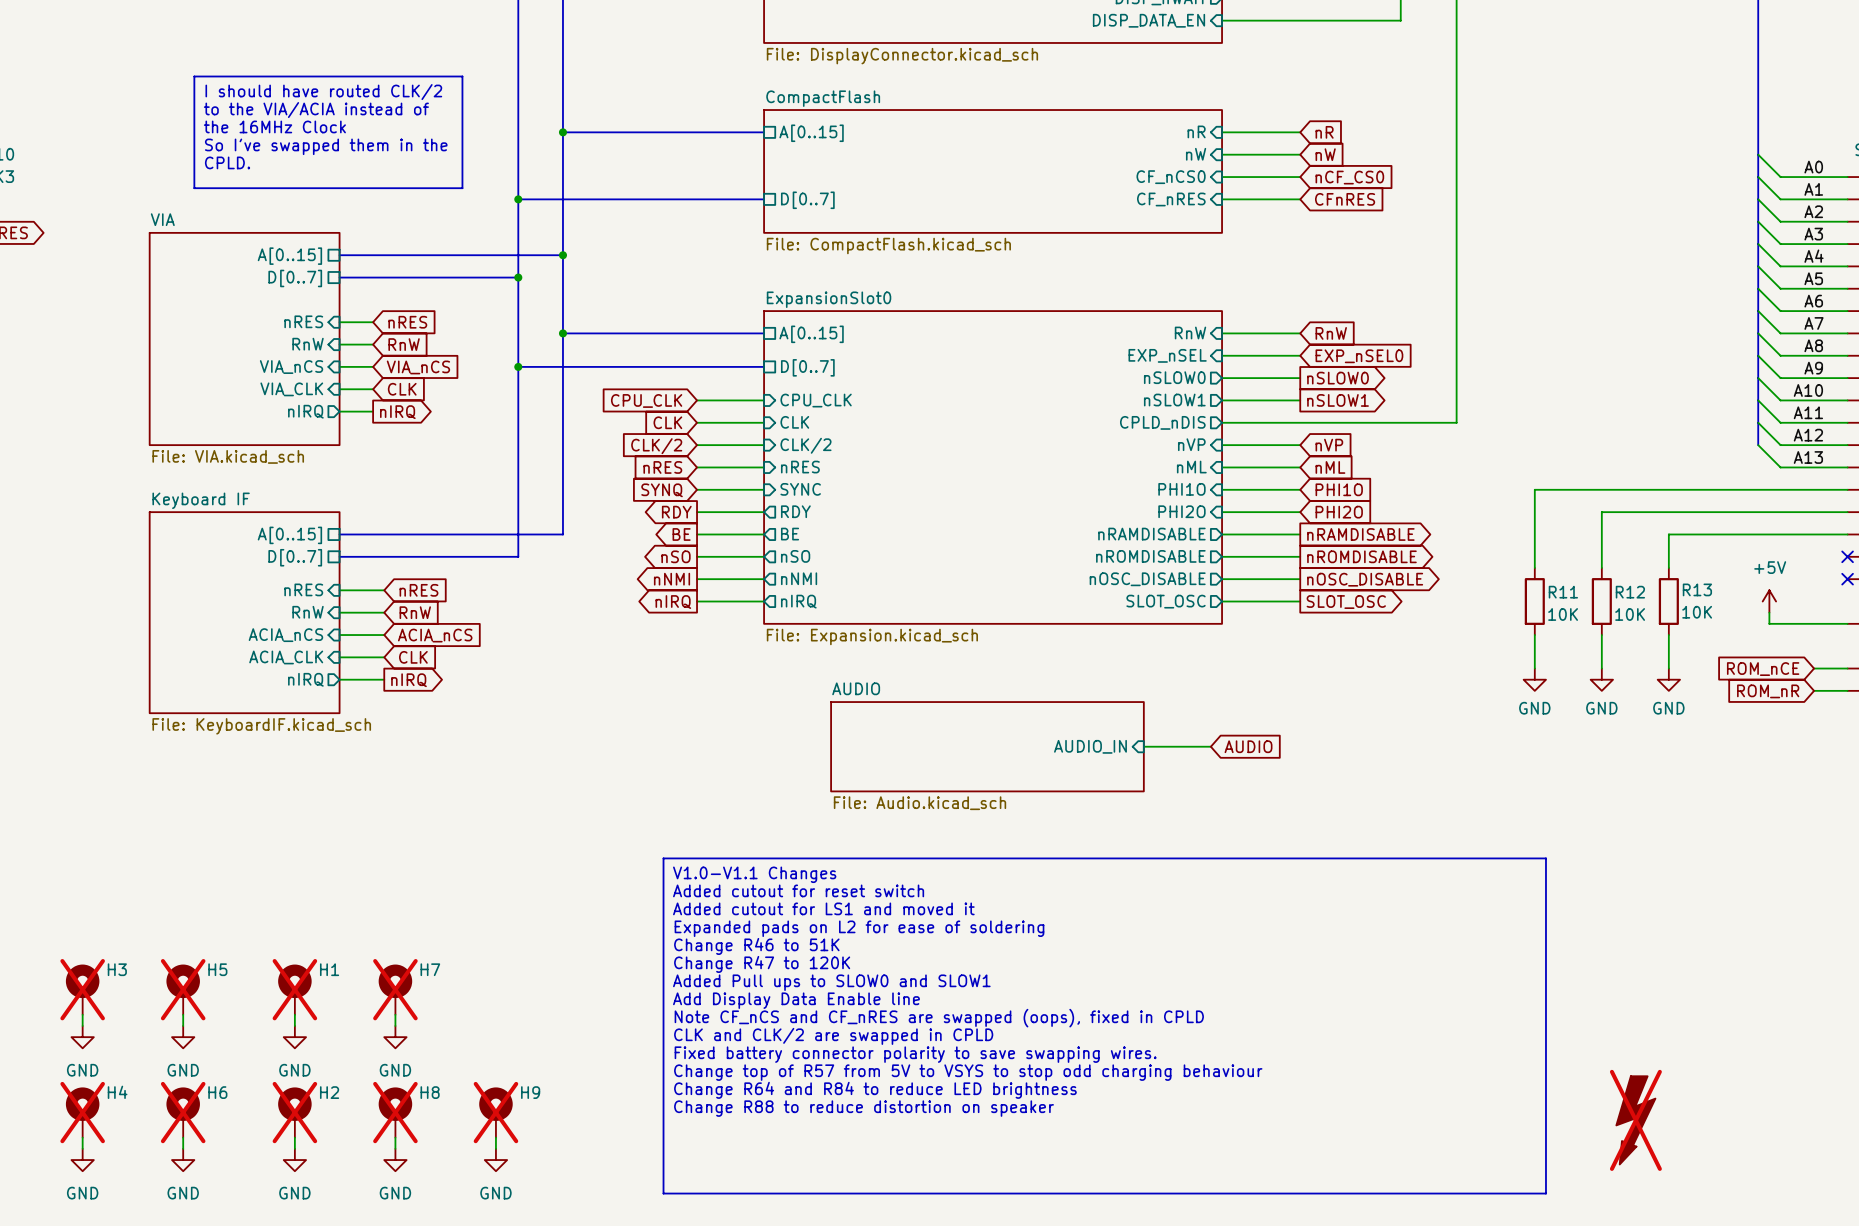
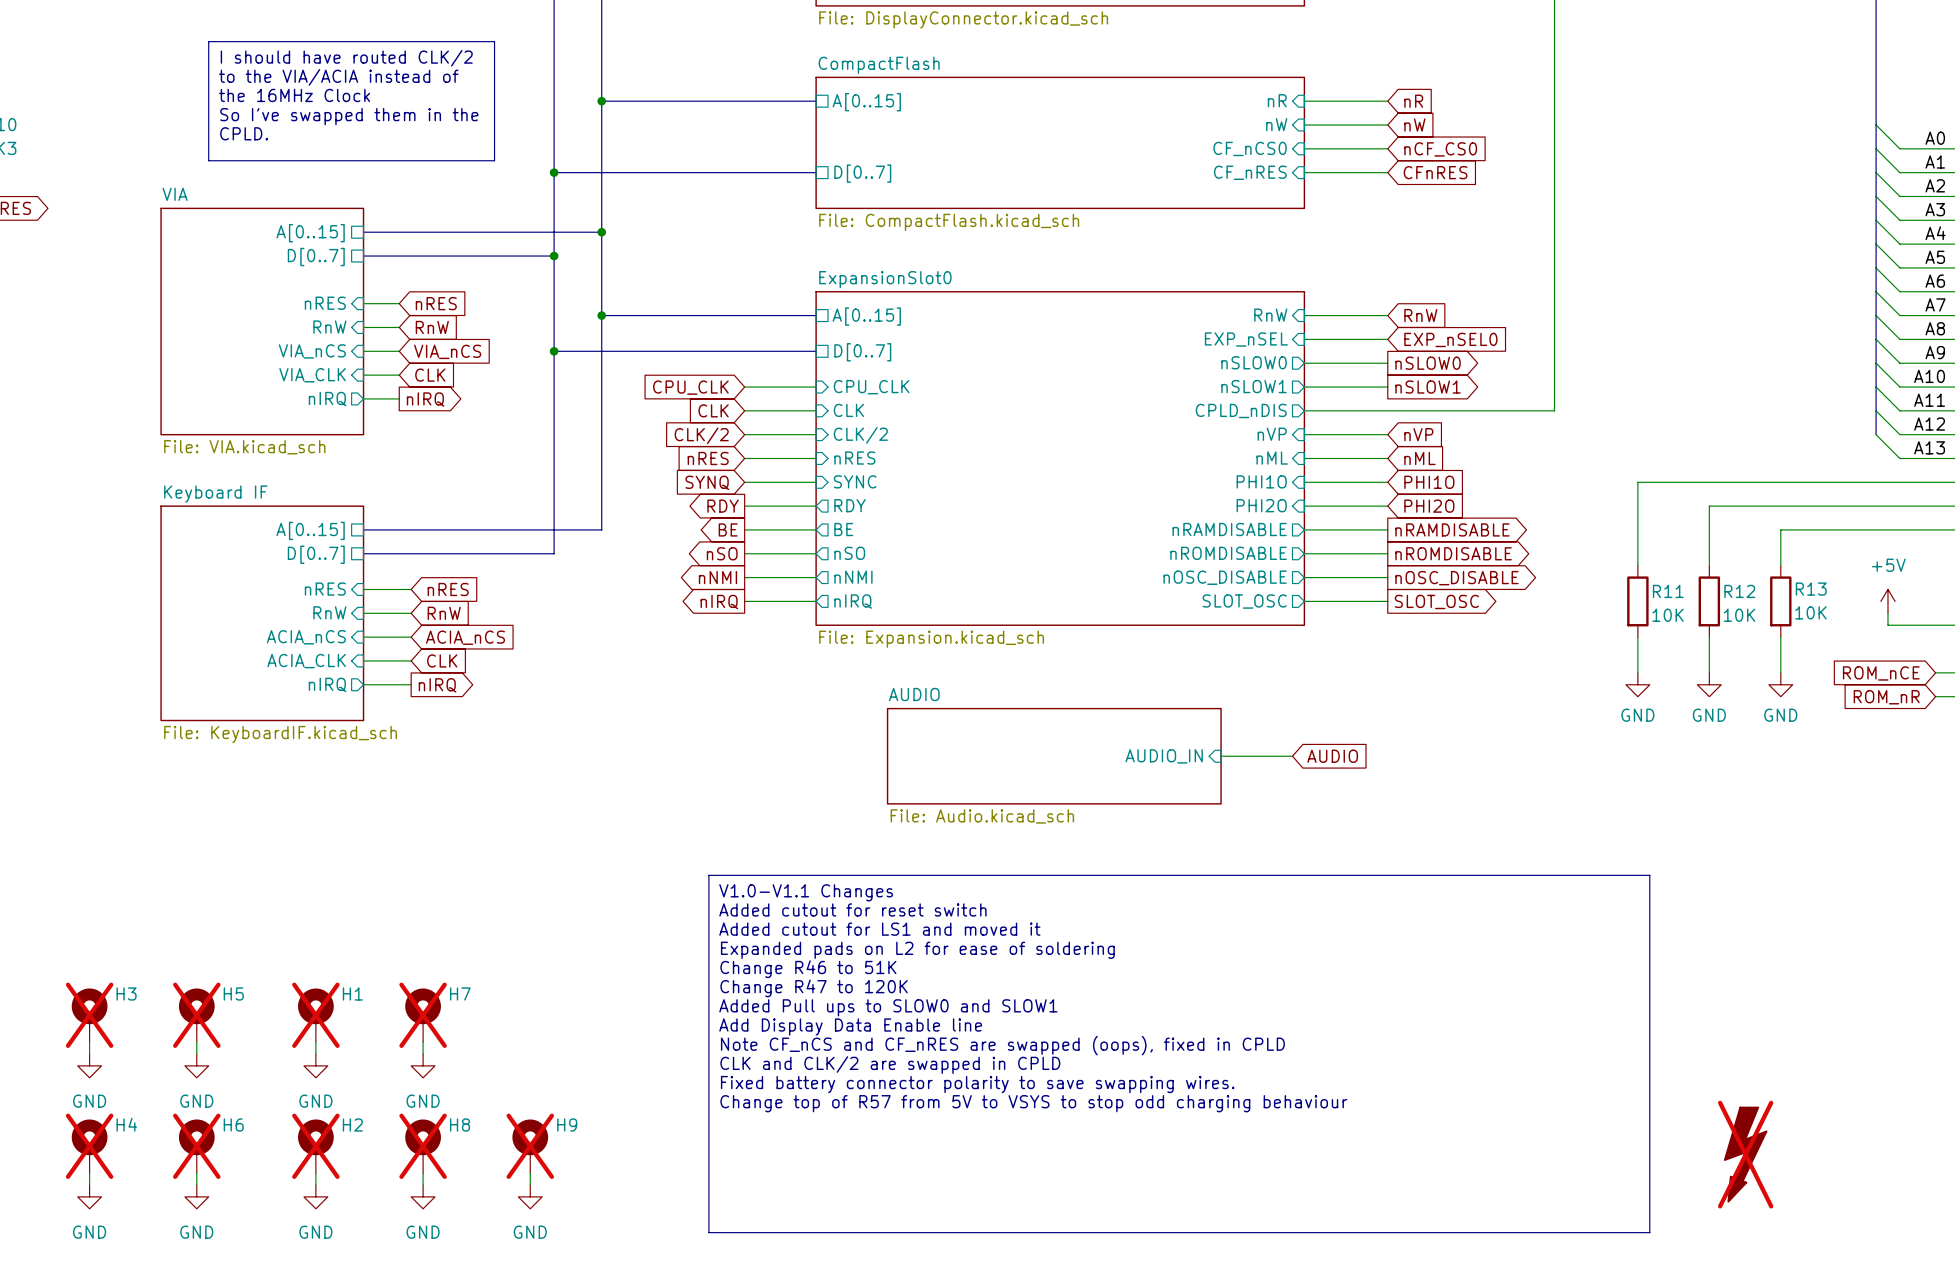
text: Change R64 and R84 to reduce LED brightness (875, 1090) -> none
text: Change R88 to reduce distortion on speaker (864, 1108) -> none

